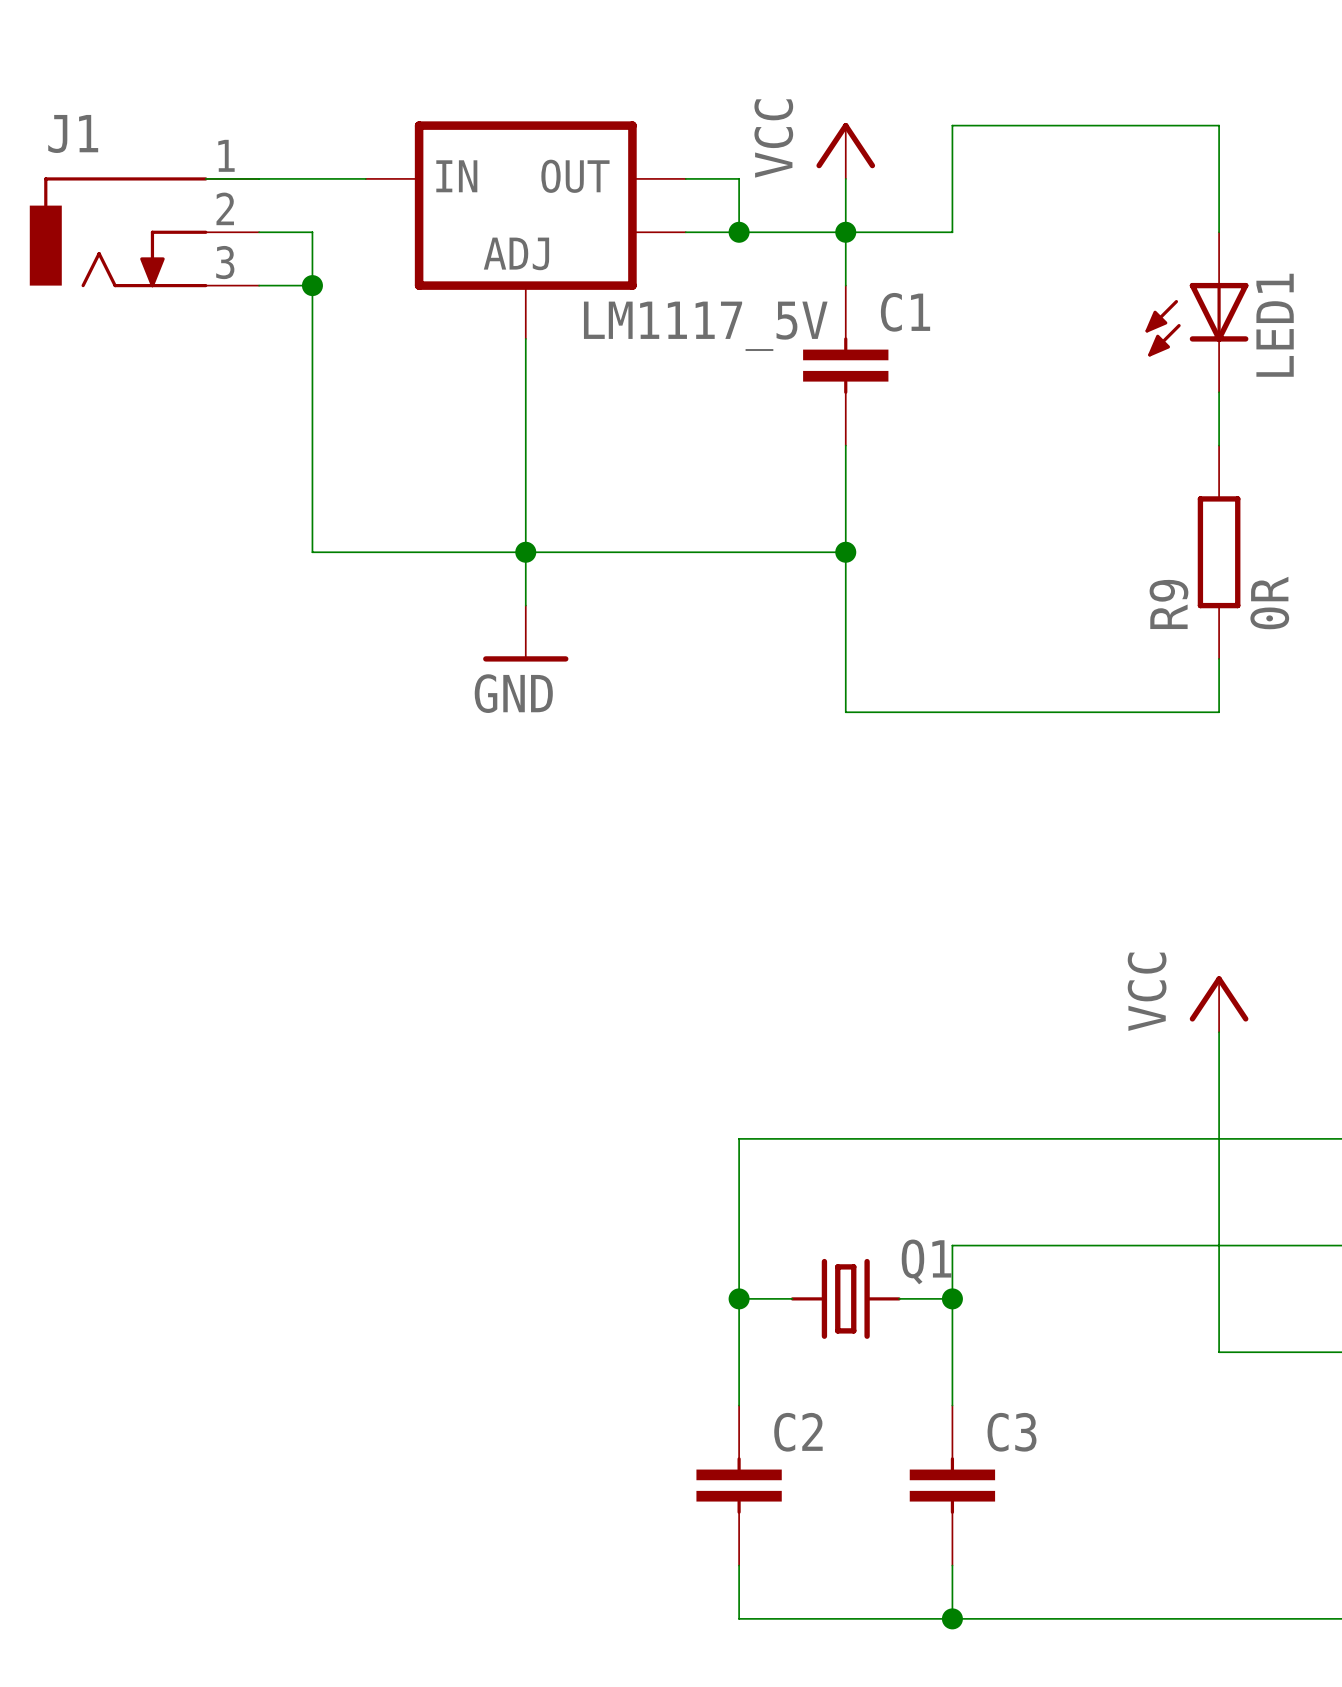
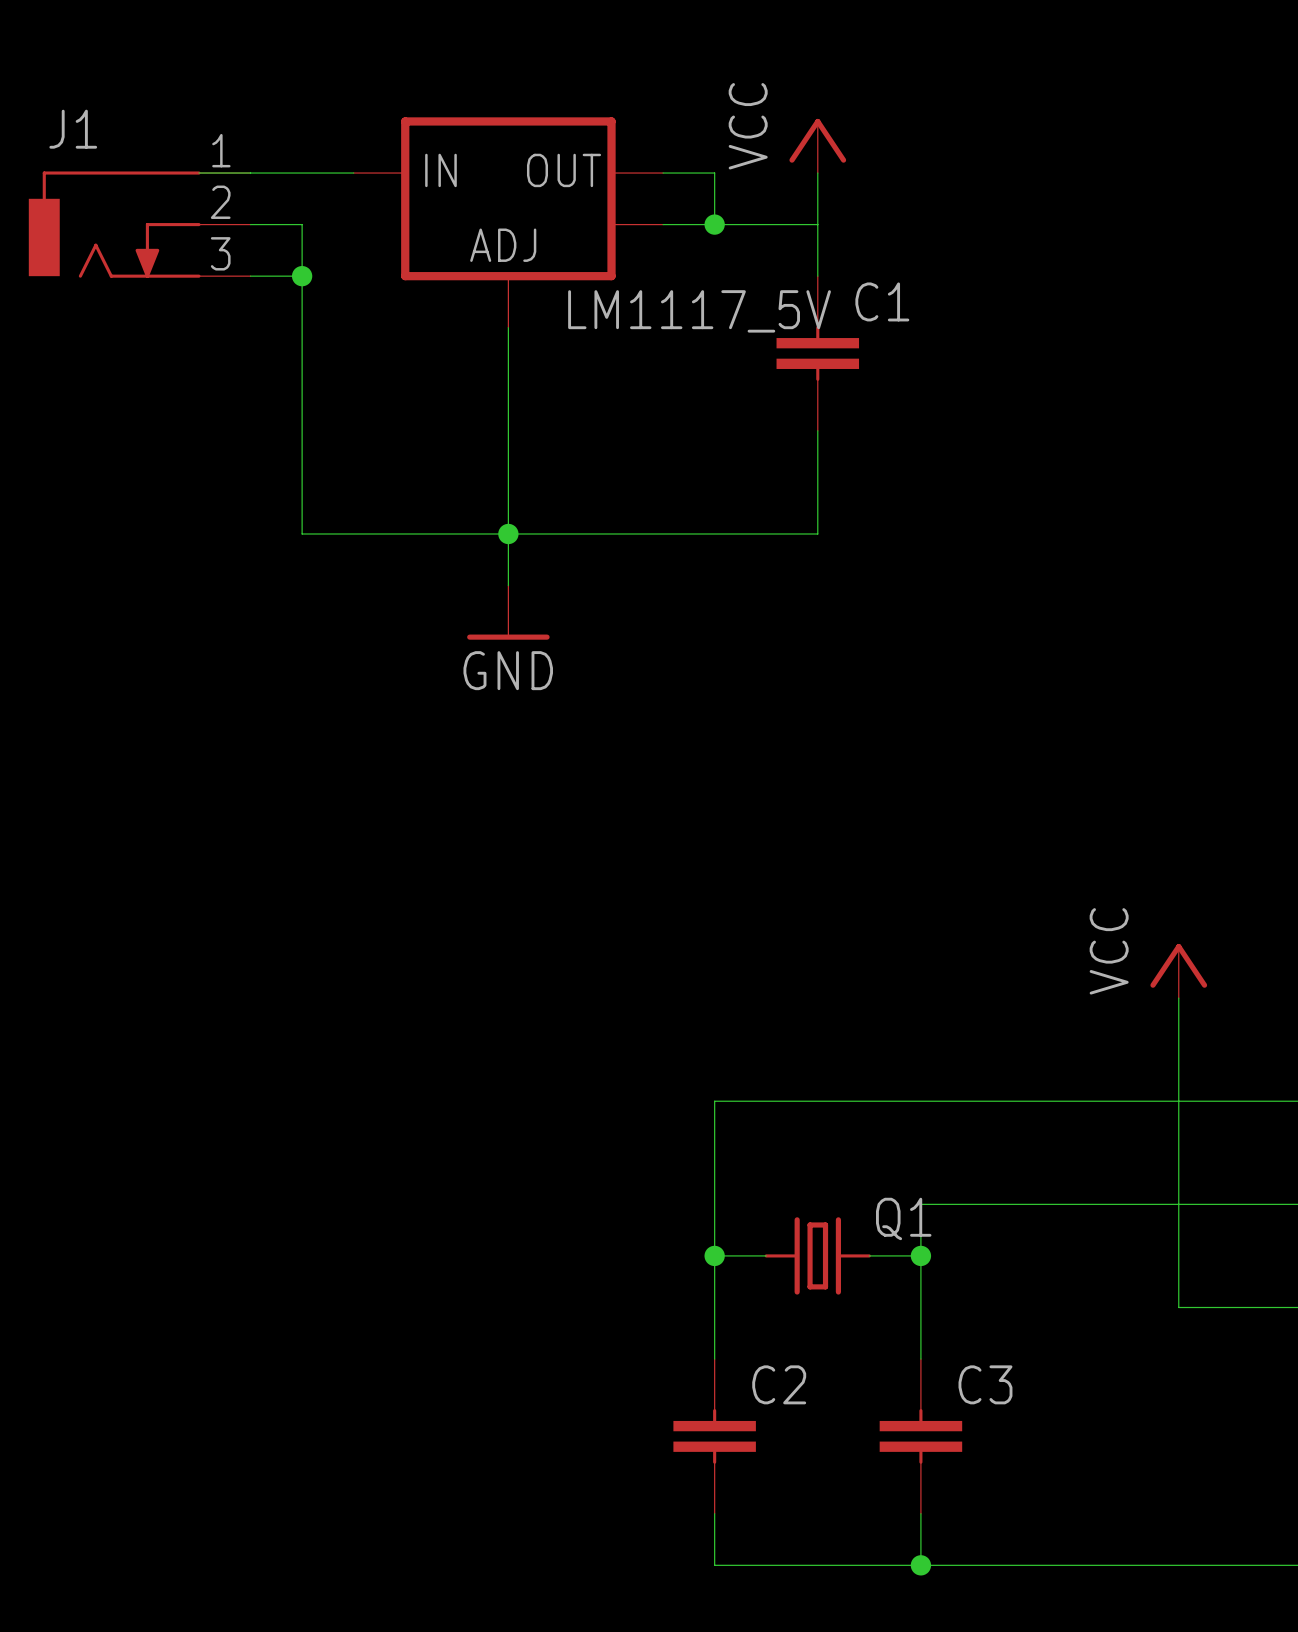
wire: (845, 232) (952, 232) (952, 125) (1219, 125) (1219, 232) -> none
junction: (845, 232) -> none
LED1: (1196, 312) -> none
wire: (1219, 392) (1219, 445) -> none
wire: (845, 552) (845, 712) (1219, 712) (1219, 658) -> none
junction: (845, 552) -> none
R9: 0R (1219, 552) -> none

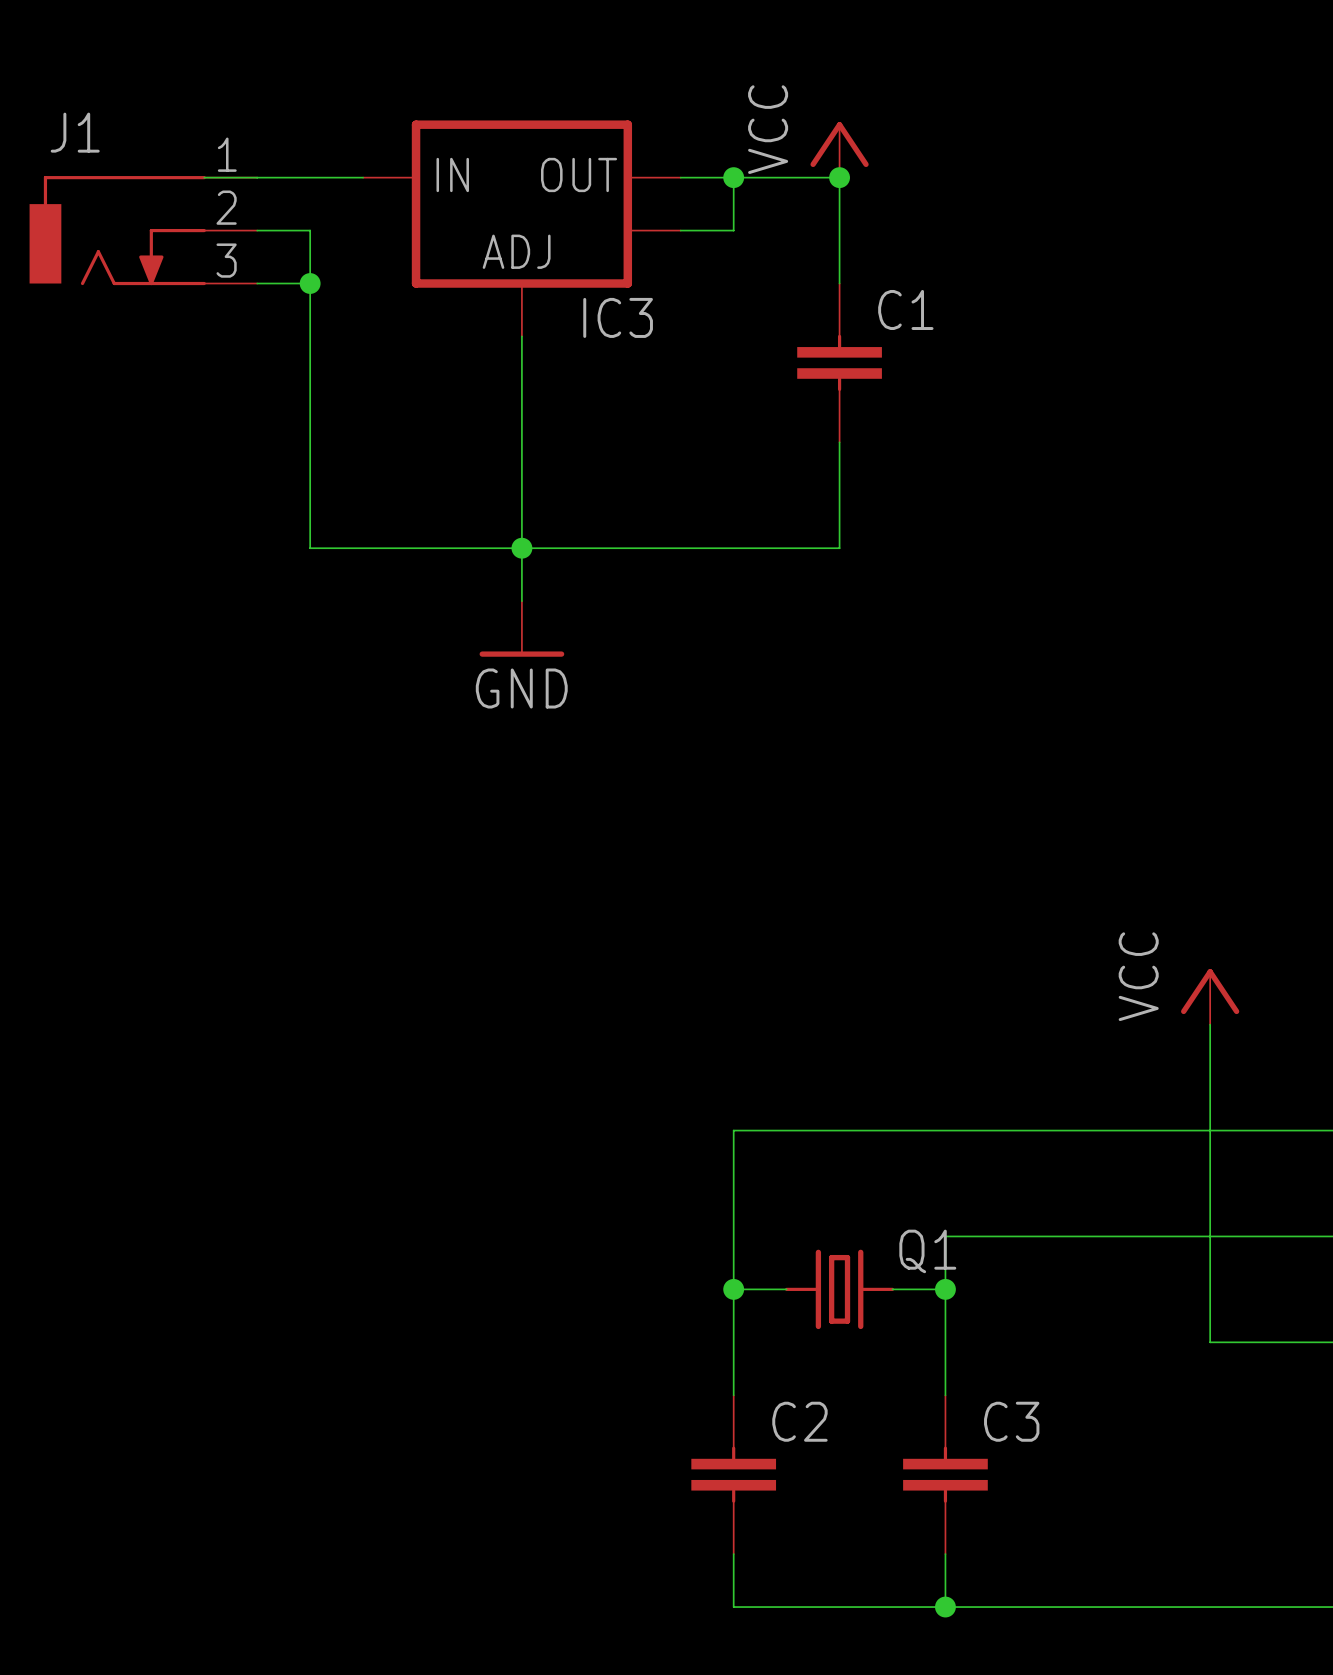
junction: none -> (839, 177)
wire: (714, 224) (817, 224) -> (733, 177) (839, 177)
junction position: (714, 224) -> (733, 177)
LM1117_5V name: LM1117_5V (699, 311) -> IC3 (618, 317)

